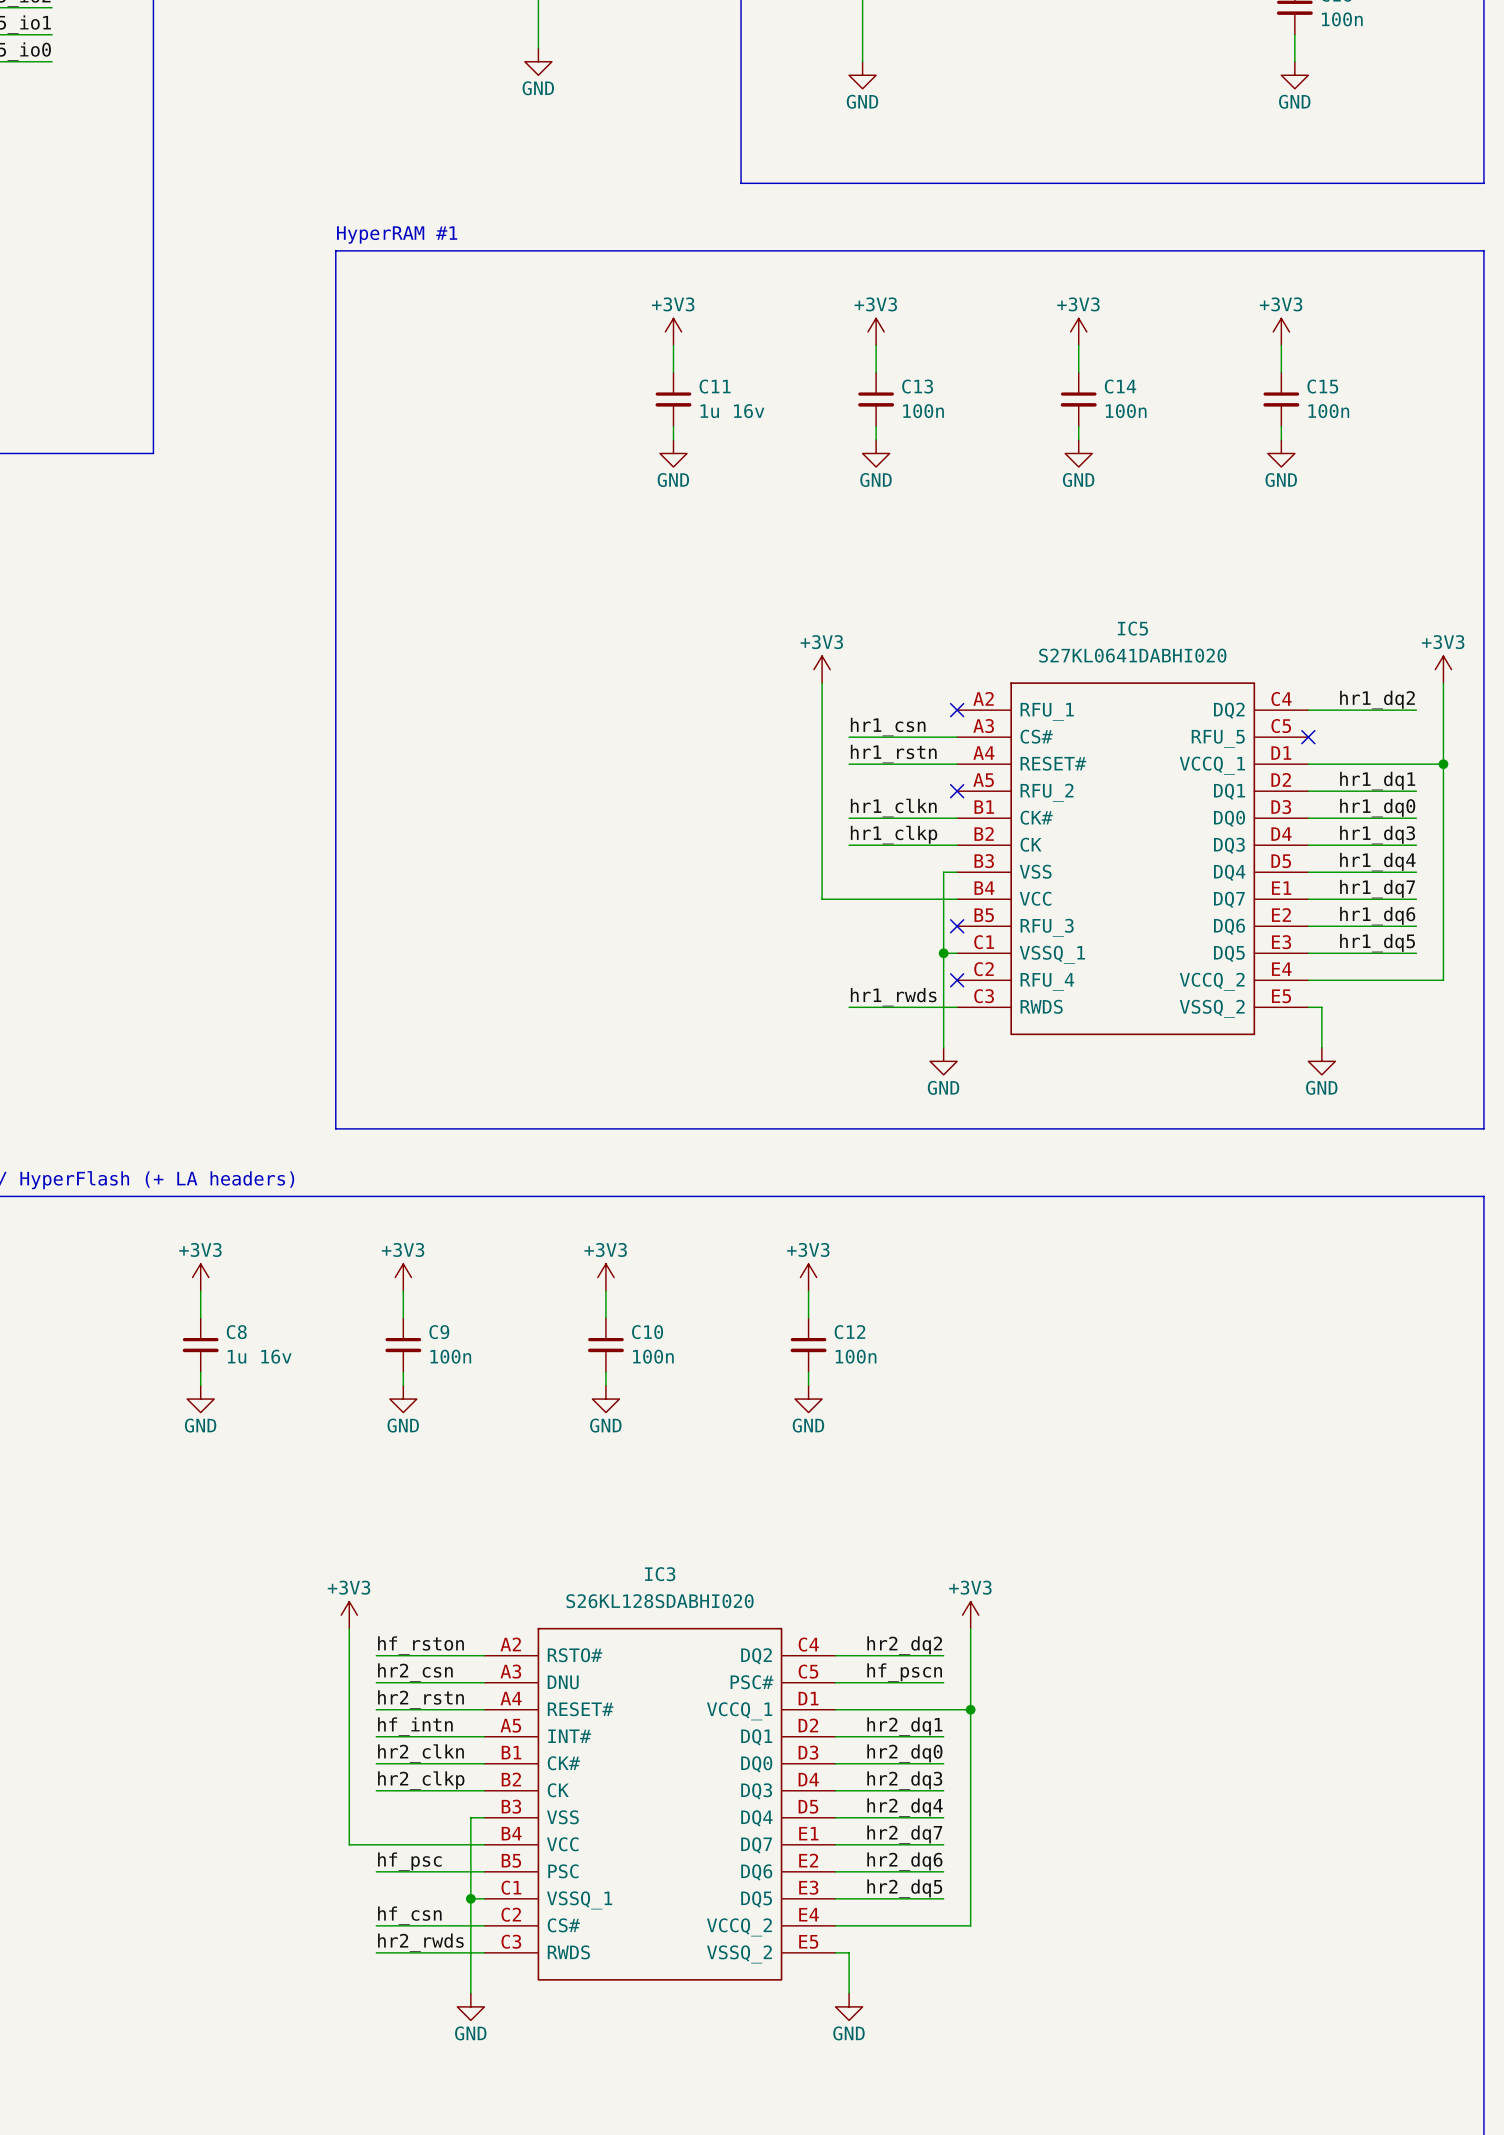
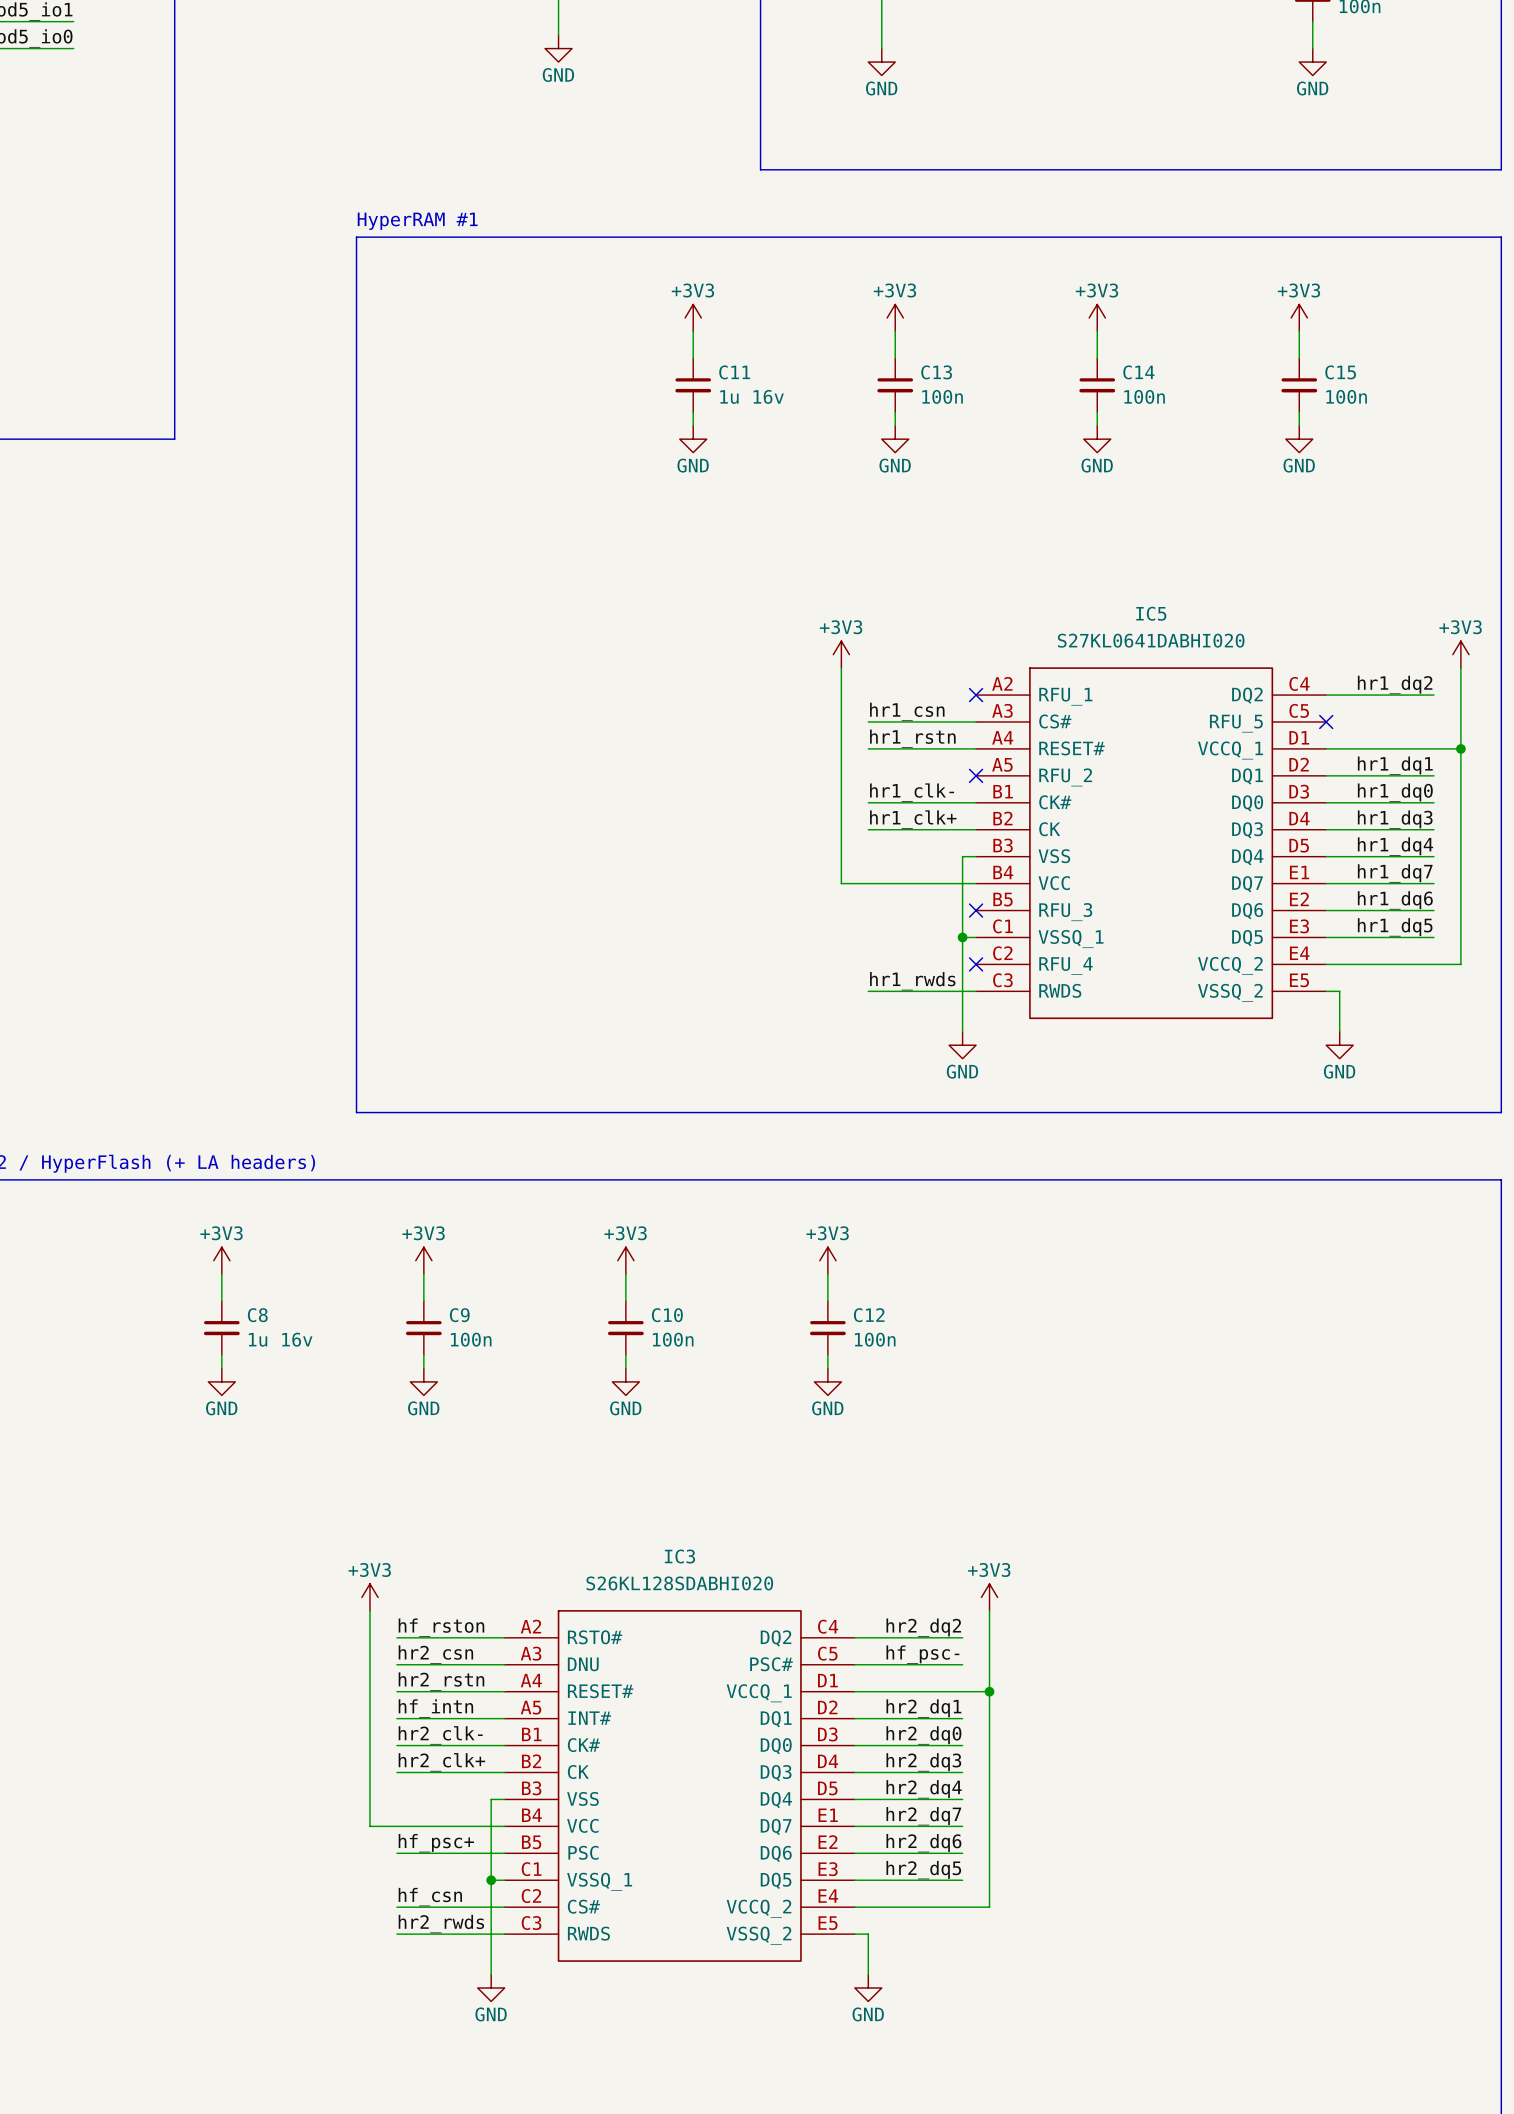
label: hr1_clkn (893, 808) -> hr1_clk- (912, 792)
label: hr1_clkp (894, 835) -> hr1_clk+ (913, 819)
label: hf_pscn (904, 1672) -> hf_psc- (922, 1654)
label: hr2_clkn (420, 1753) -> hr2_clk- (440, 1735)
label: hr2_clkp (421, 1780) -> hr2_clk+ (441, 1762)
label: hf_psc (409, 1861) -> hf_psc+ (436, 1843)

